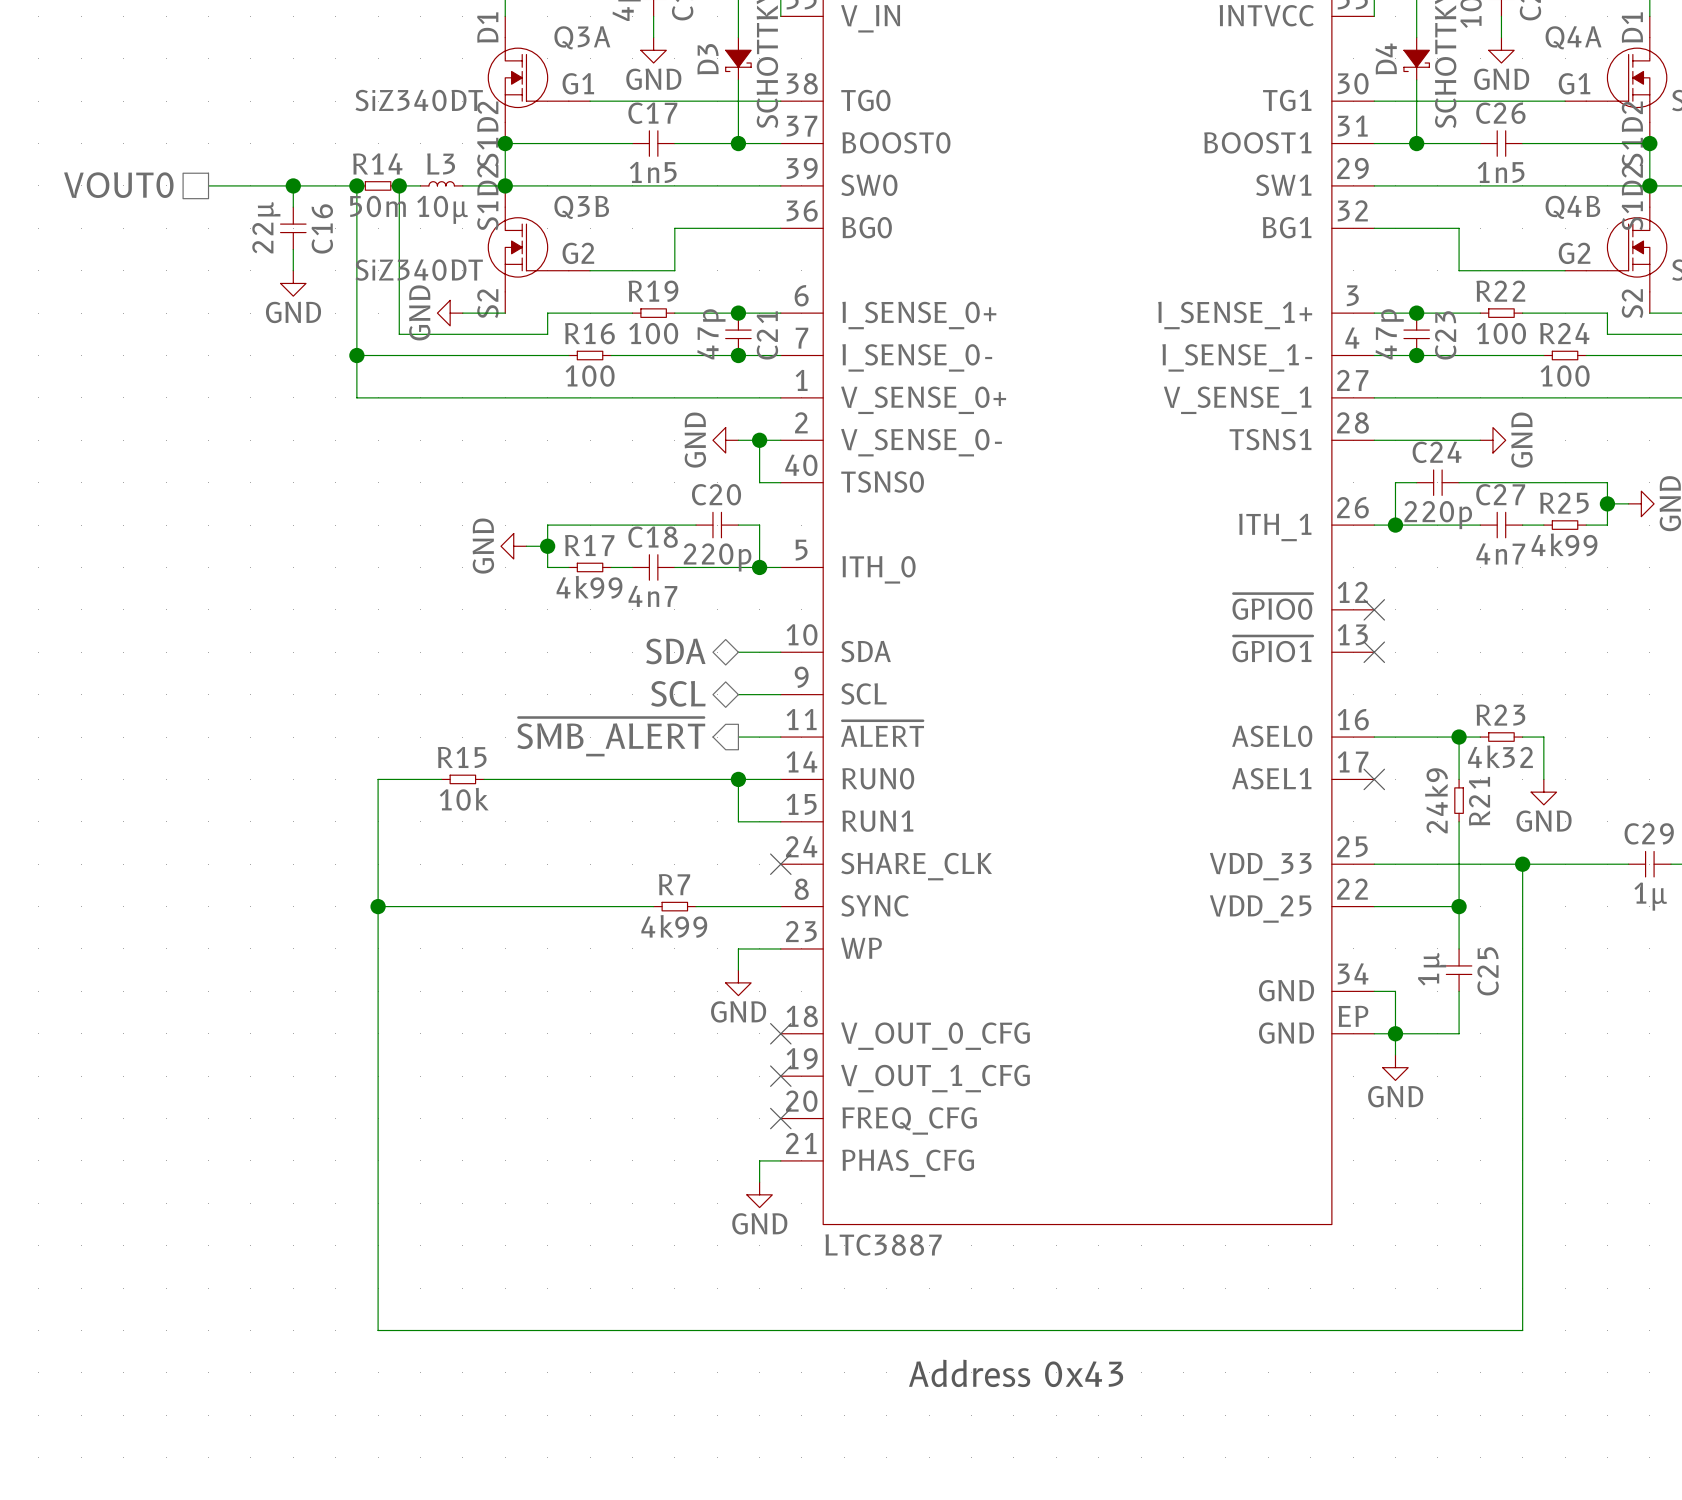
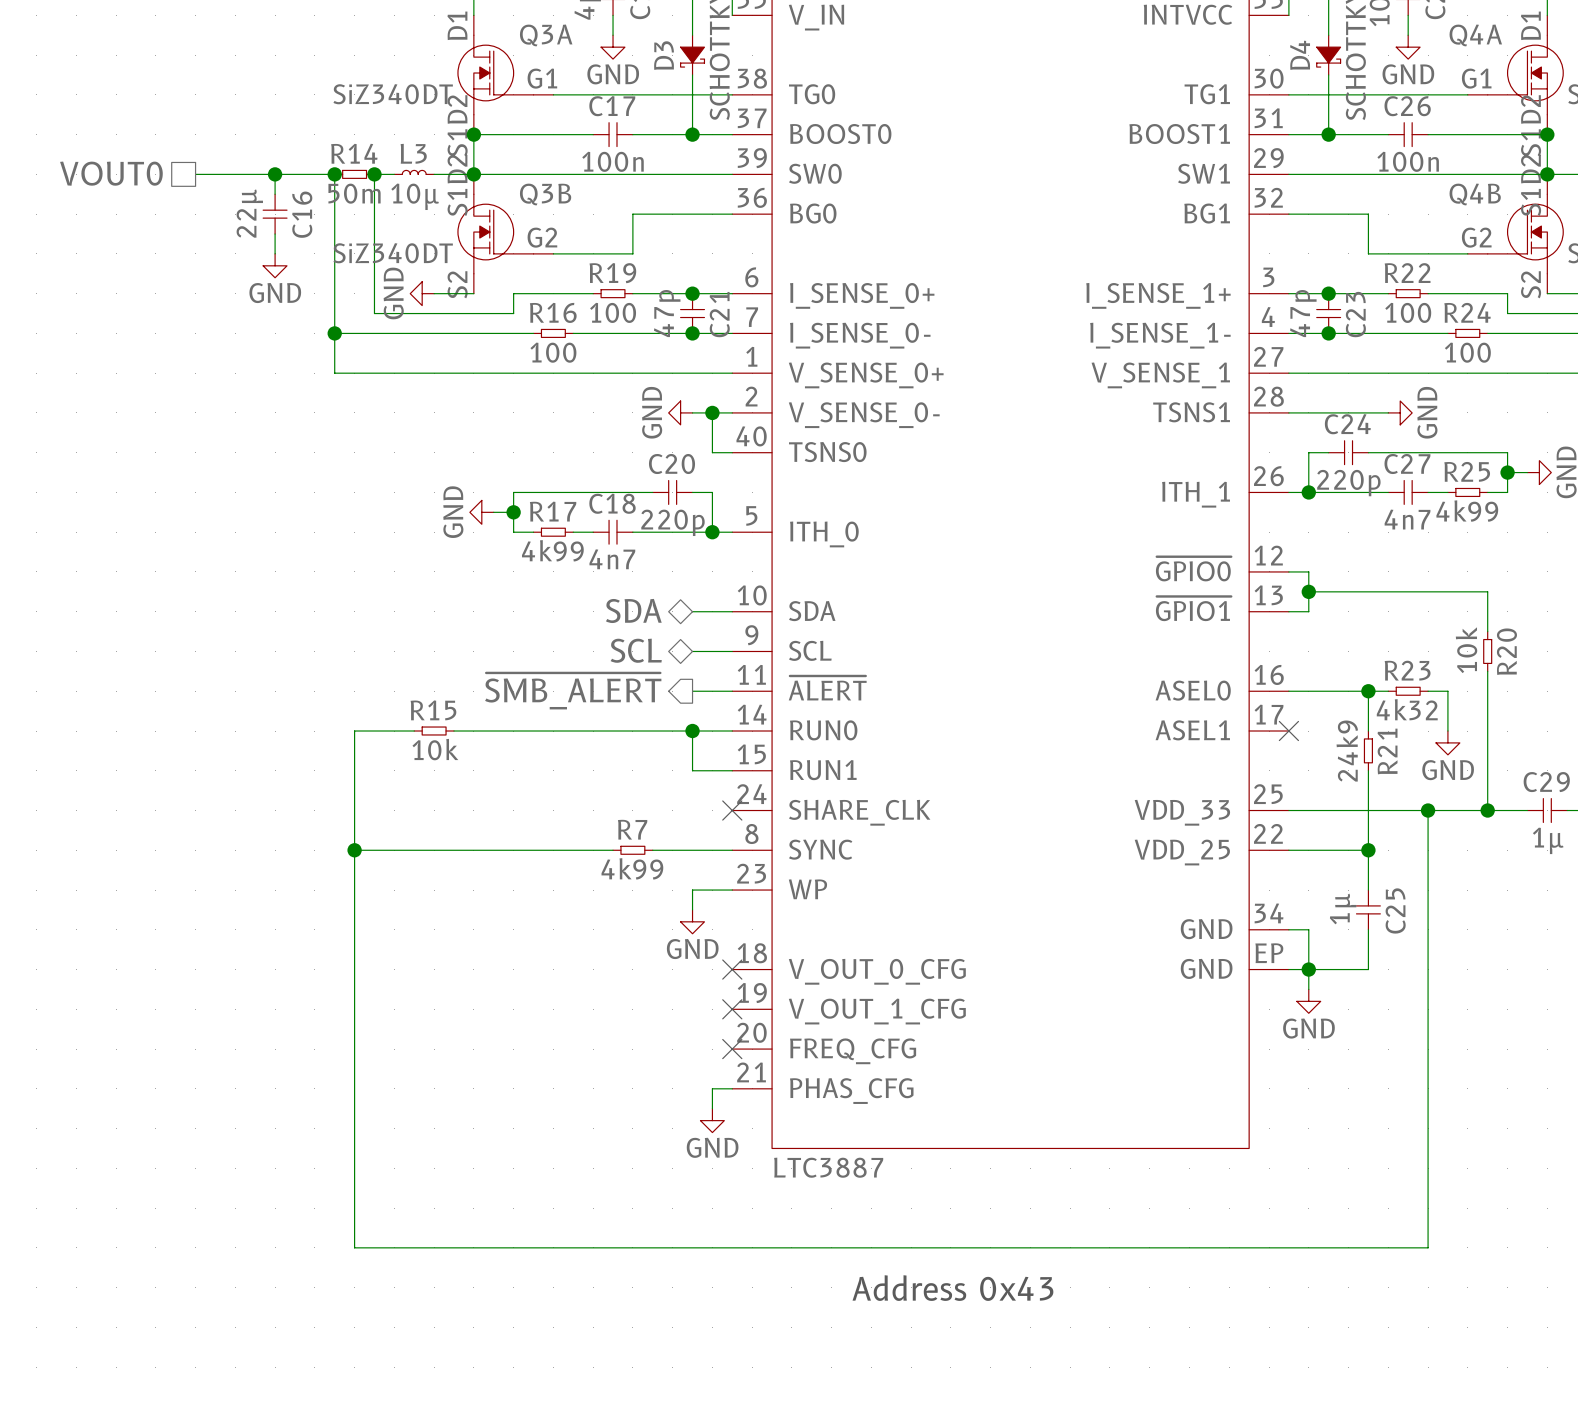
C17 value: 1n5 (653, 172) -> 100n (613, 161)
C26 value: 1n5 (1501, 172) -> 100n (1408, 161)
wire: none -> (1288, 571) (1308, 571) (1308, 611) (1288, 611)
no-connect mark: (1374, 609) -> none
wire: none -> (1308, 591) (1487, 591) (1487, 631)
junction: none -> (1308, 591)
no-connect mark: (1374, 652) -> none
R20: none -> 10k (1487, 651)
wire: none -> (1487, 671) (1487, 810)
junction: none -> (1487, 810)

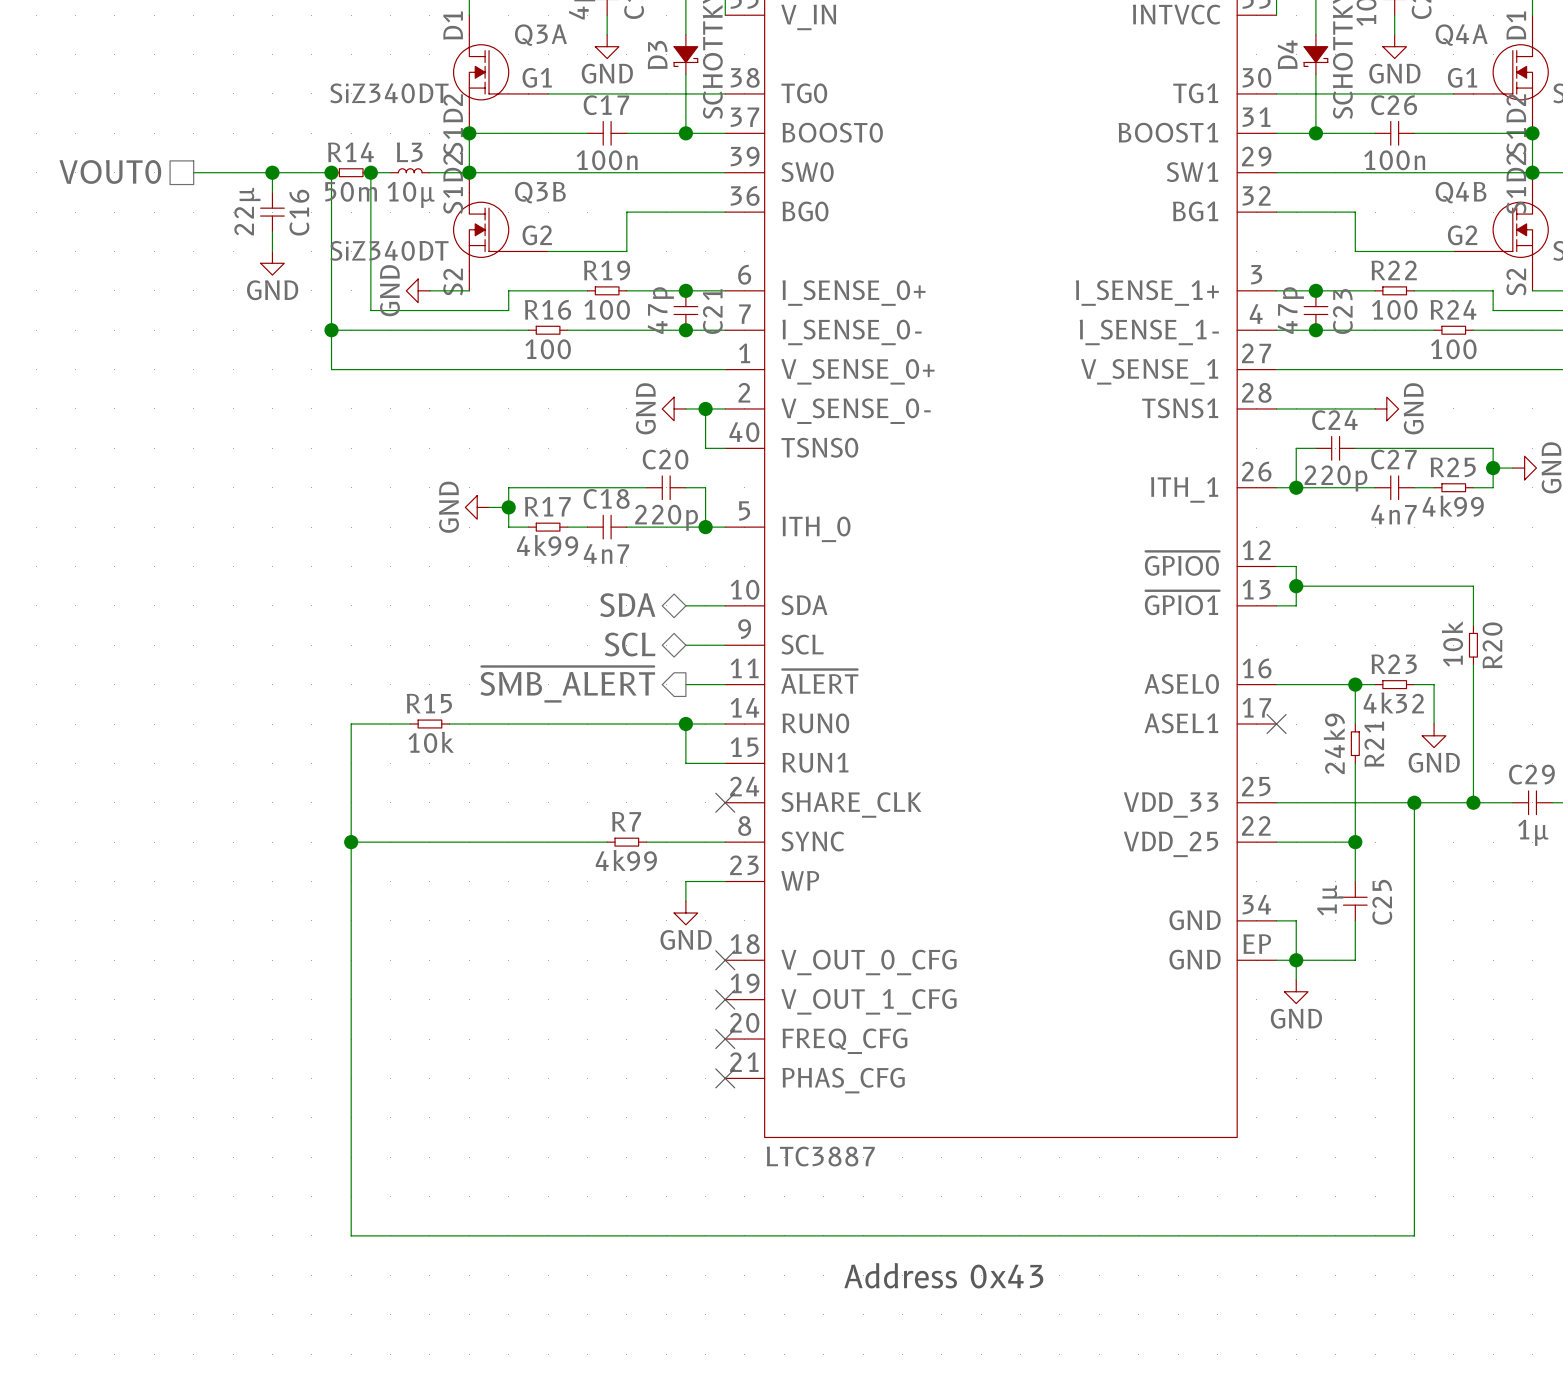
wire: (732, 1088) (712, 1088) (712, 1108) -> none
no-connect mark: none -> (725, 1078)
power symbol: GND (712, 1120) -> none

